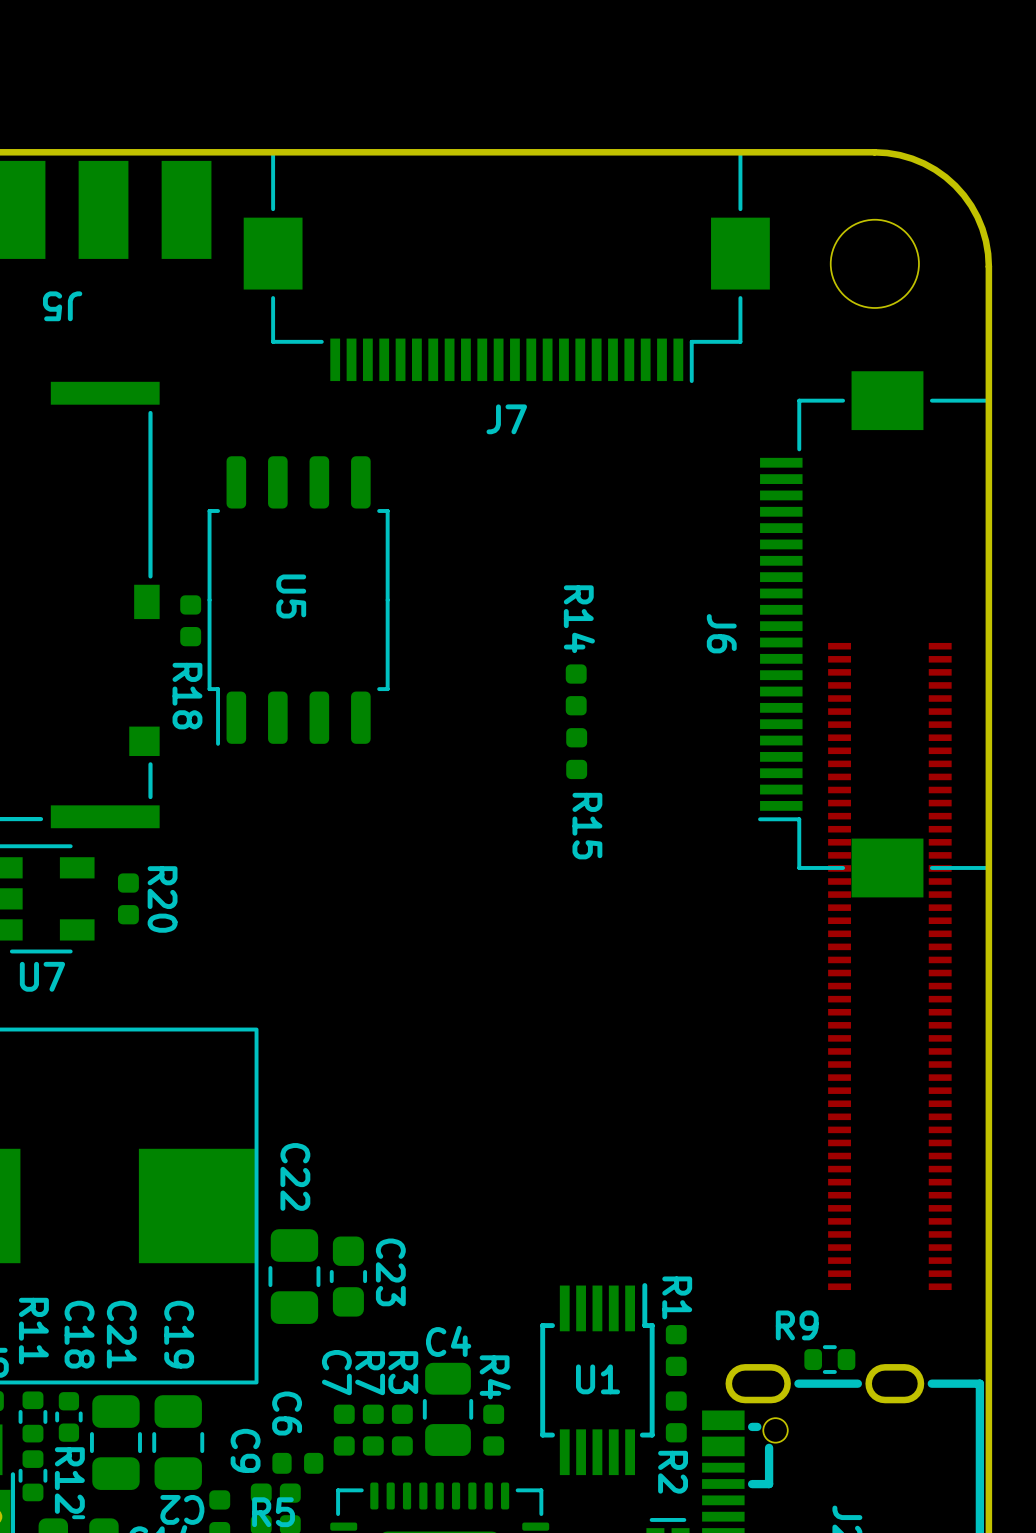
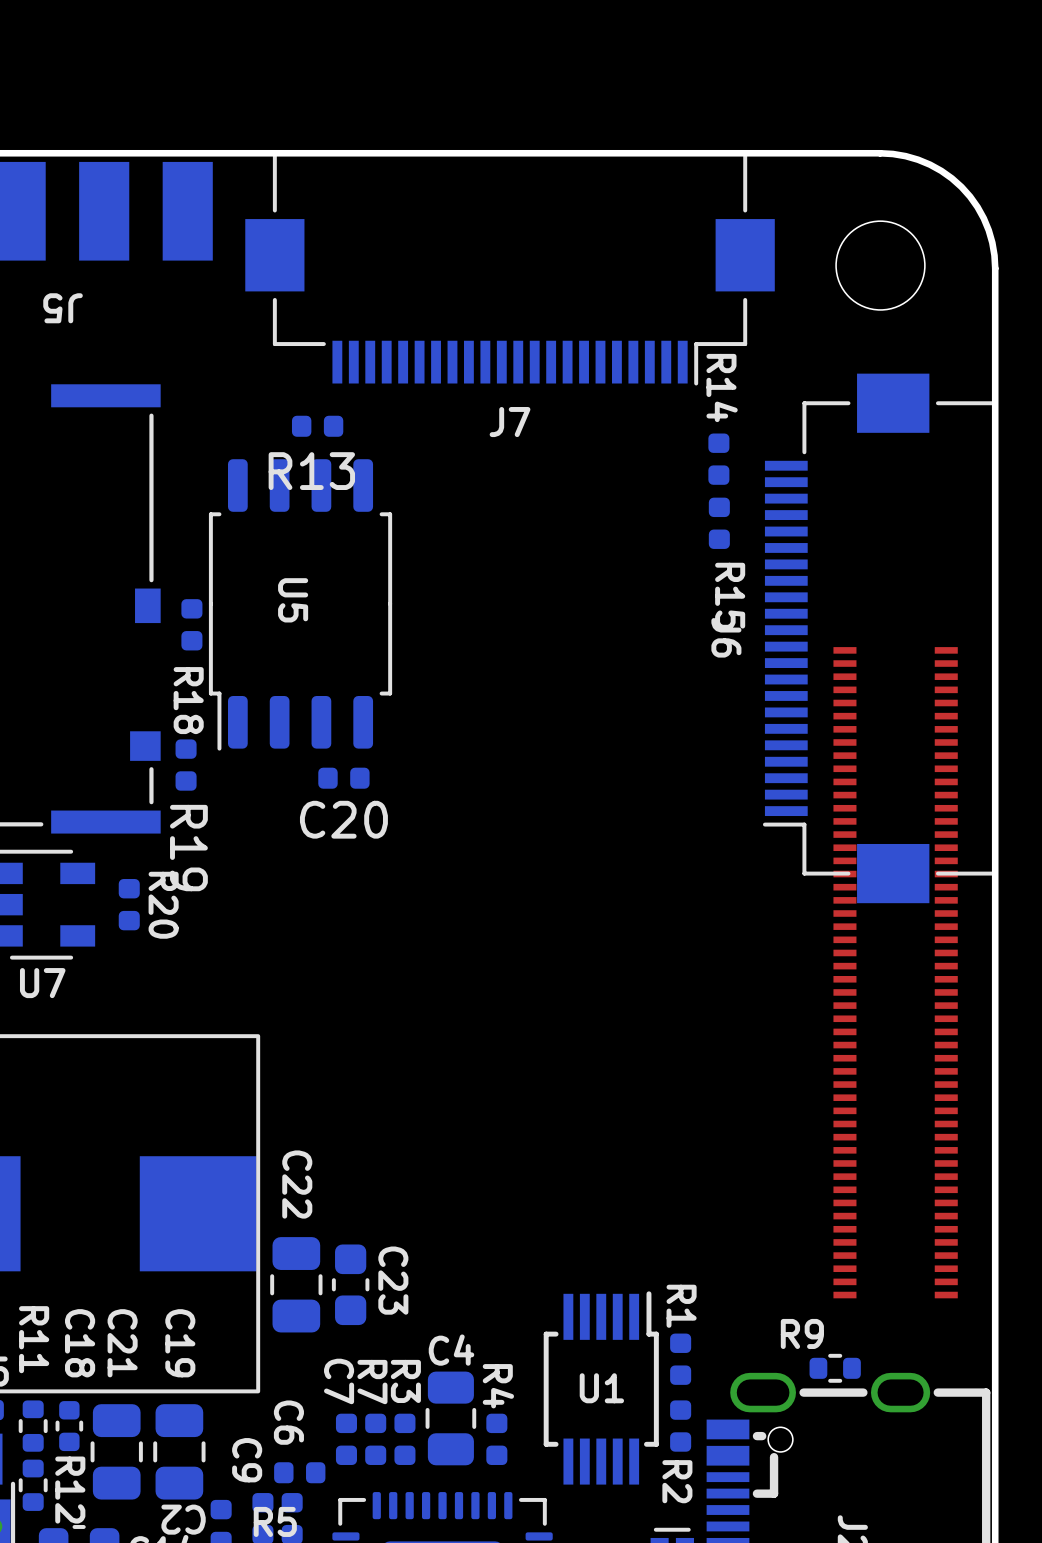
R13: none -> (317, 426)
R14 position: (576, 689) -> (718, 459)
R15 position: (576, 753) -> (719, 523)
R19: none -> (186, 765)
C20: none -> (343, 778)

